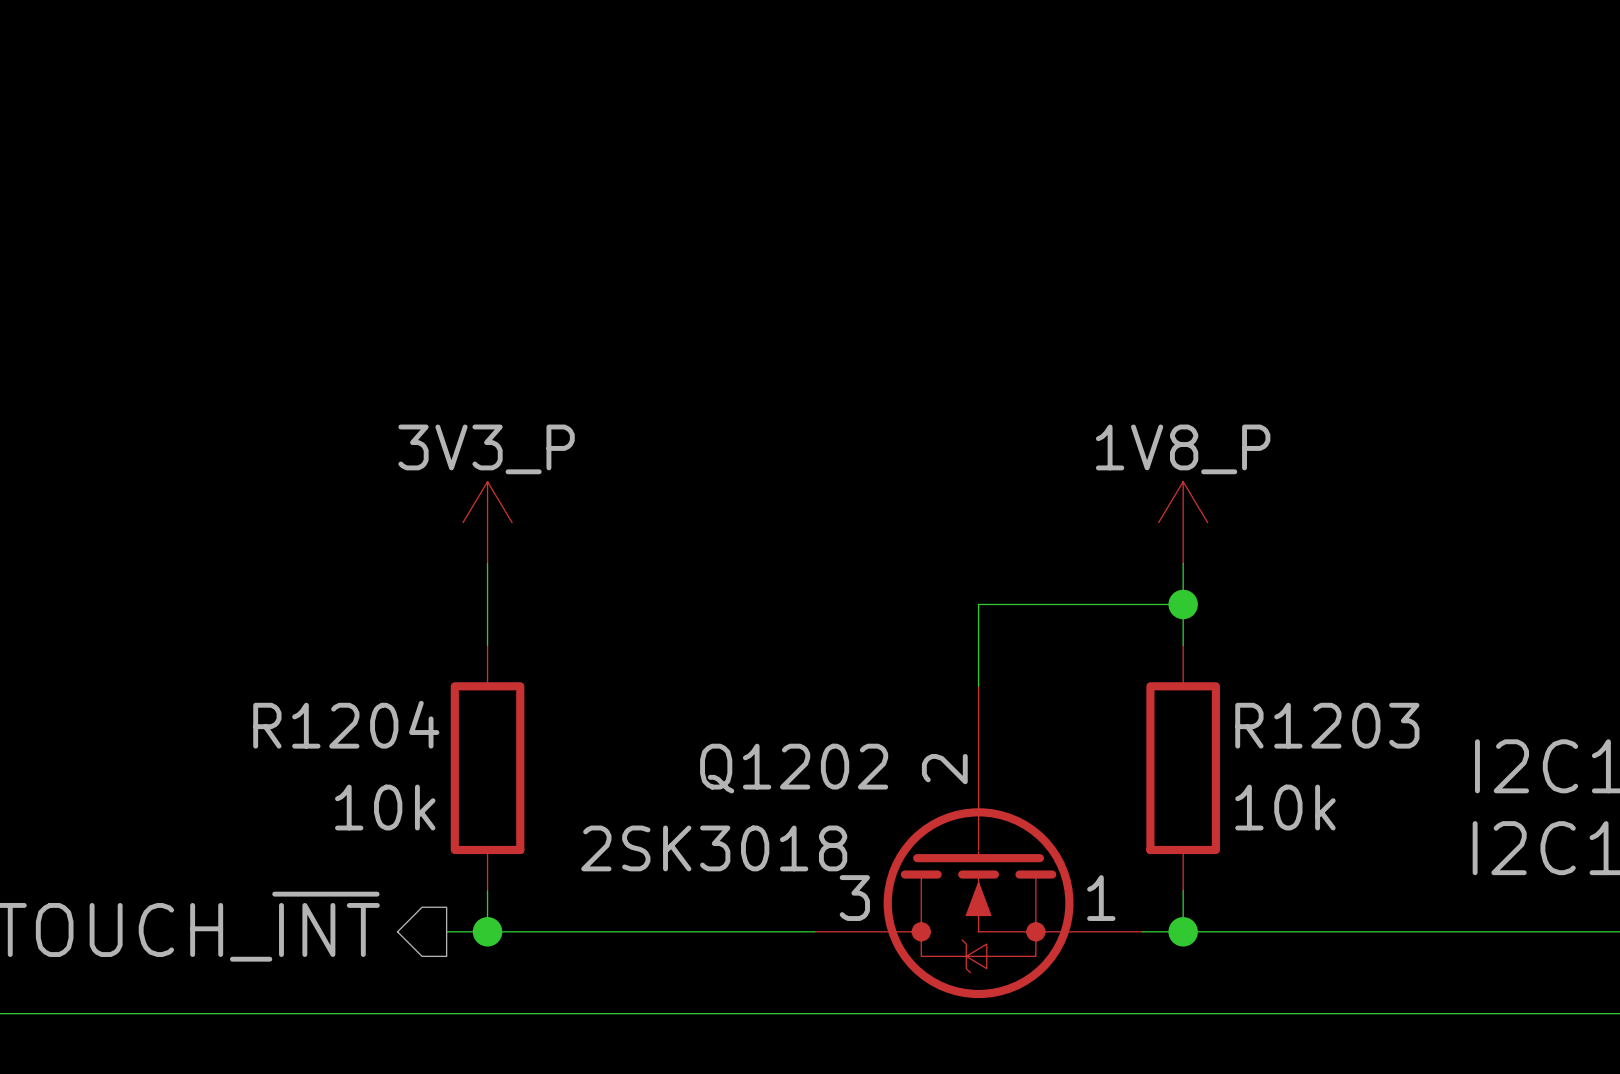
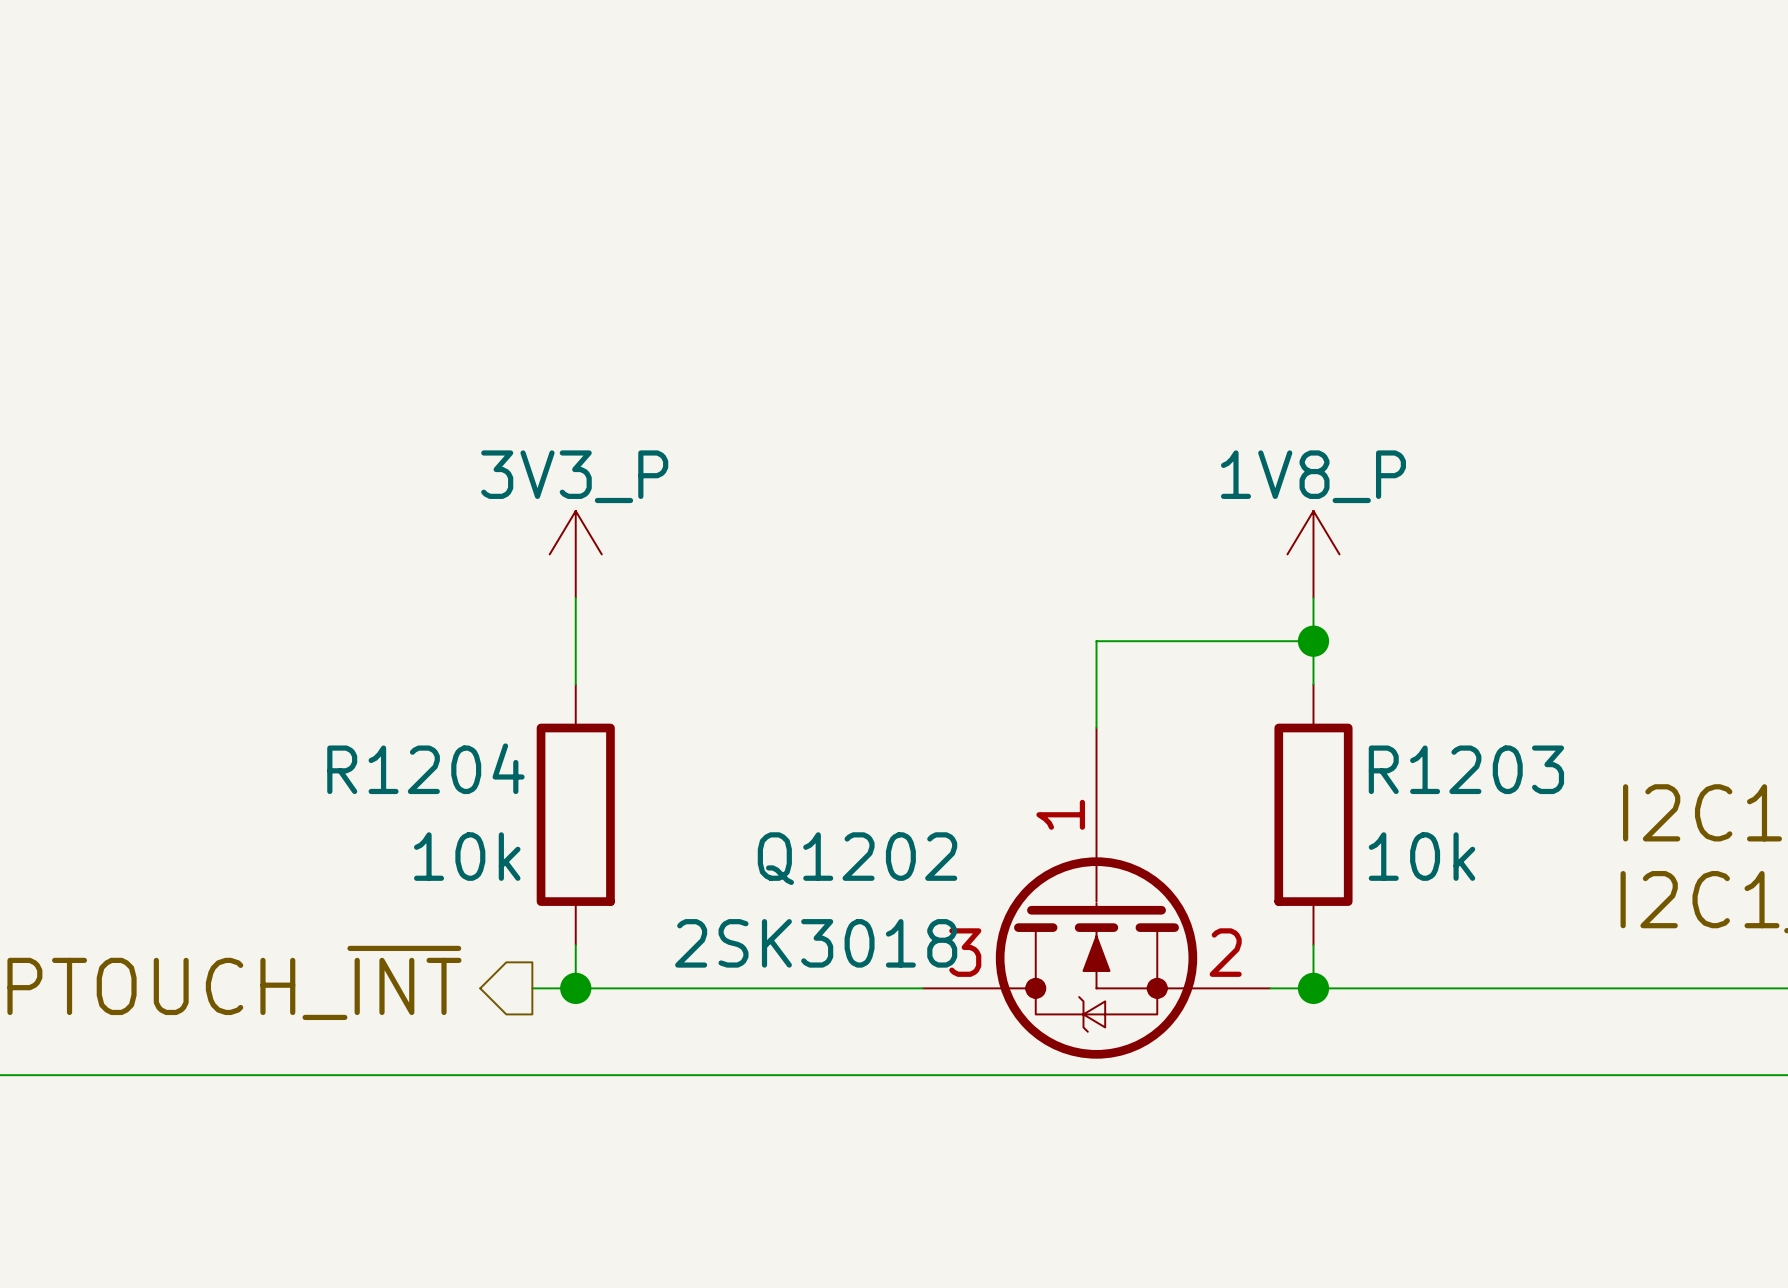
Q1202 name position: Q1202 (794, 768) -> Q1202 (857, 858)
Q1202 pin number: 2 (944, 769) -> 1 (1060, 814)
Q1202 value position: 2SK3018 (714, 848) -> 2SK3018 (816, 943)
Q1202 pin number: 1 (1101, 898) -> 2 (1225, 952)

